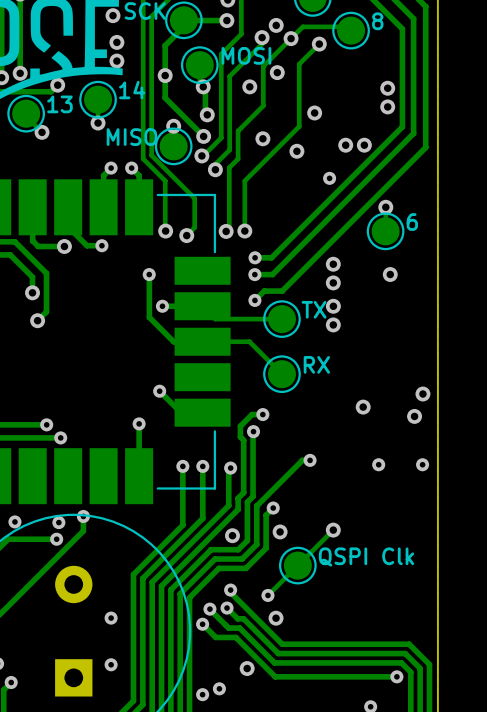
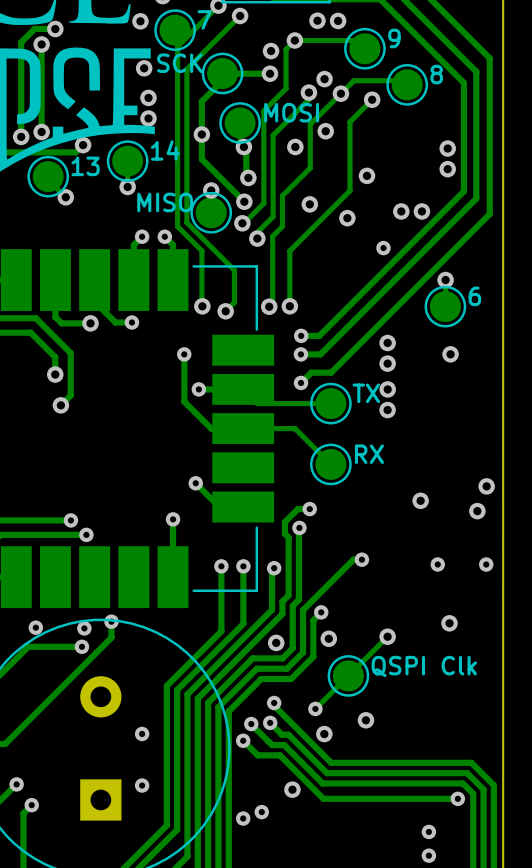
via: none -> (449, 623)
via: none -> (365, 720)

